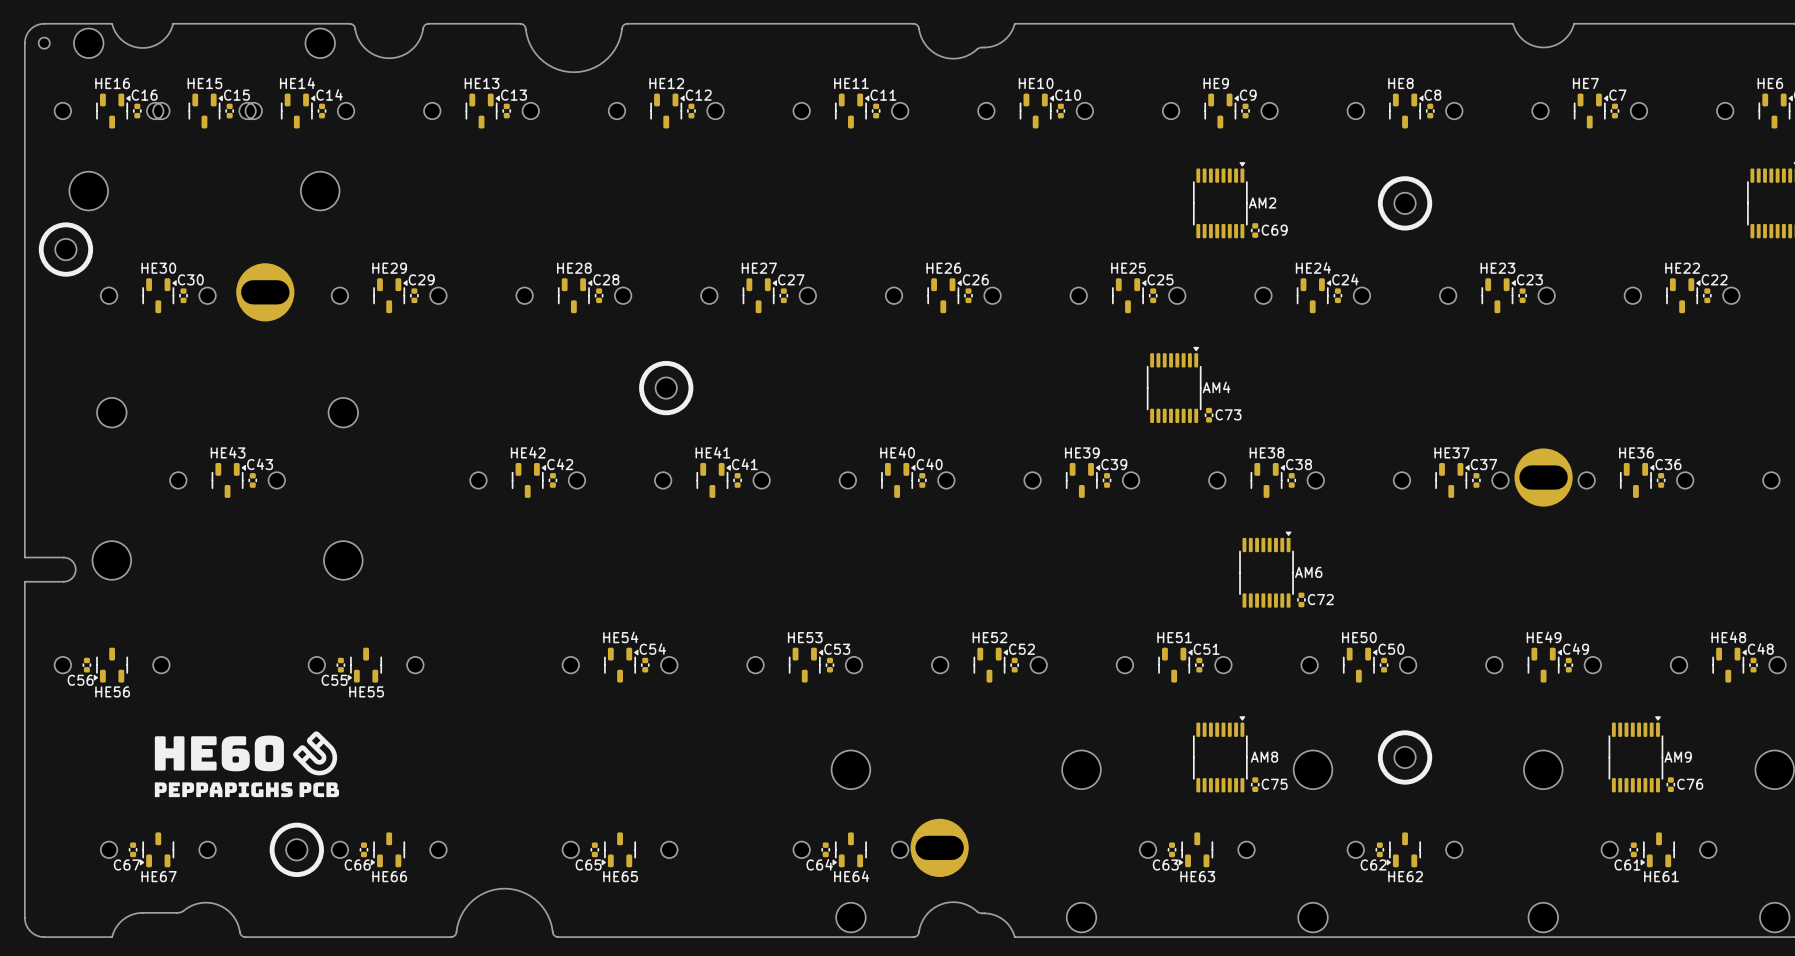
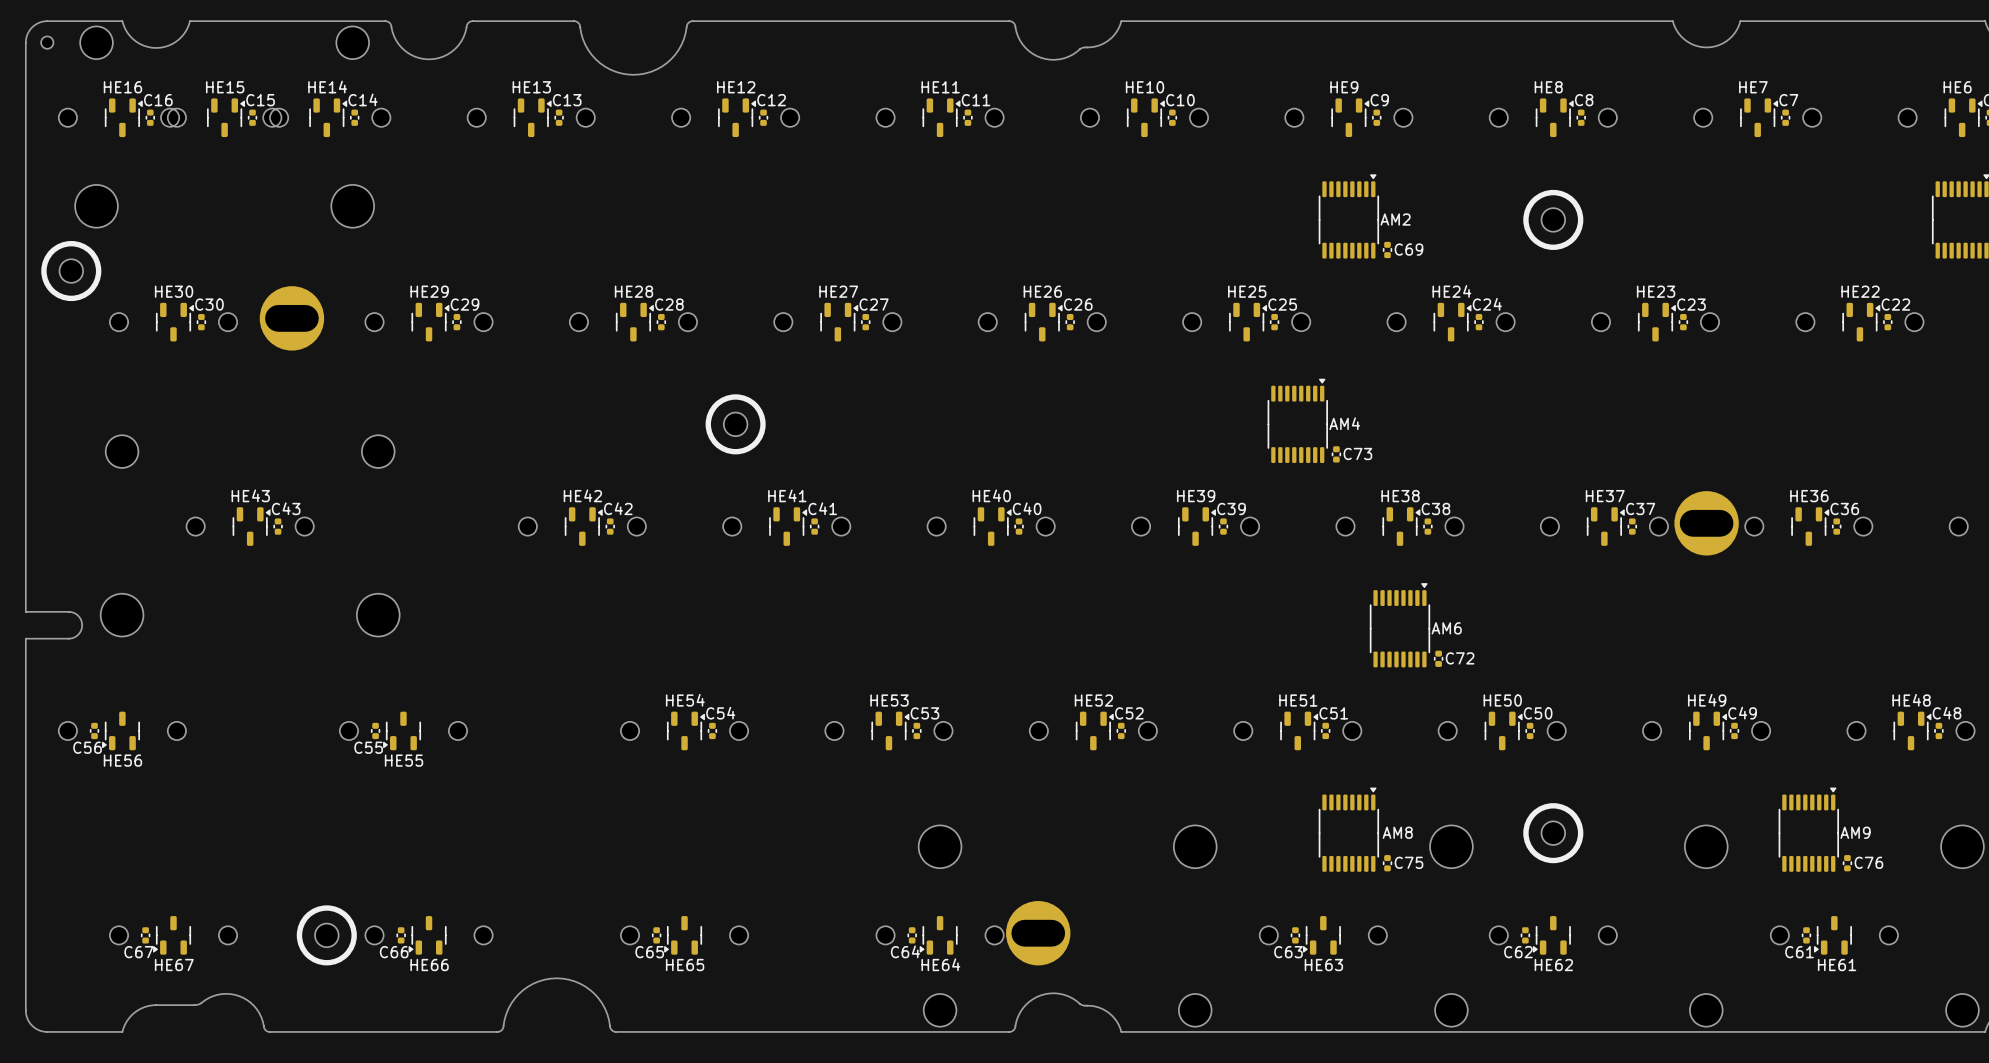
drawing: [154, 731, 340, 798] -> none

